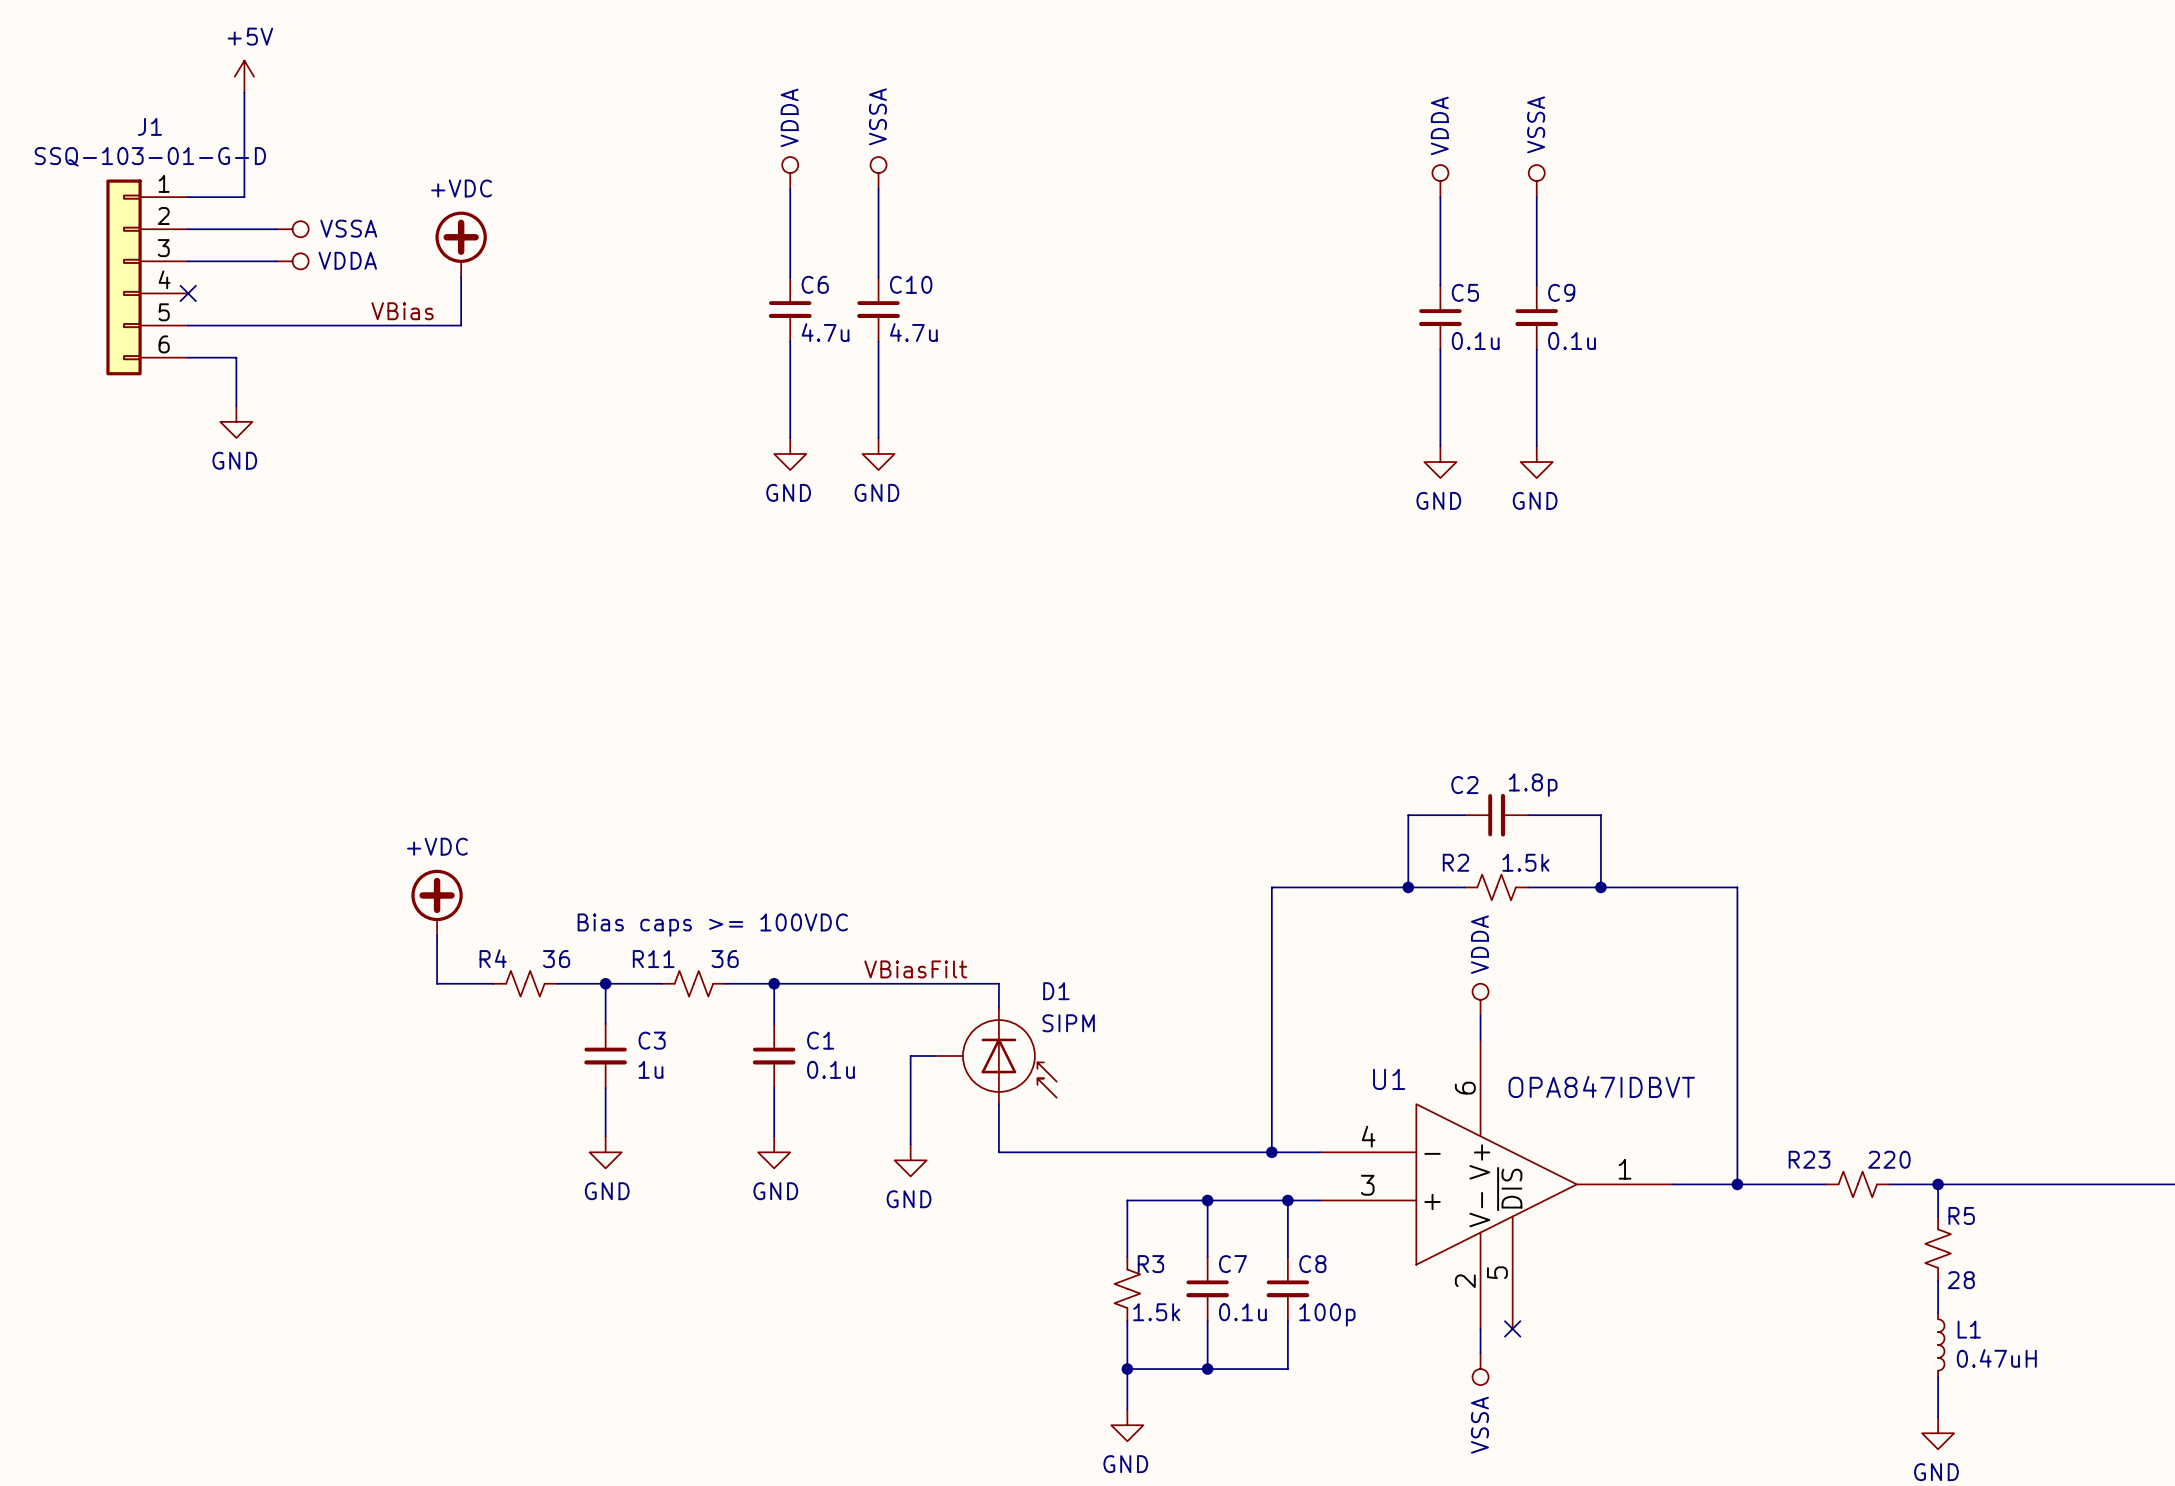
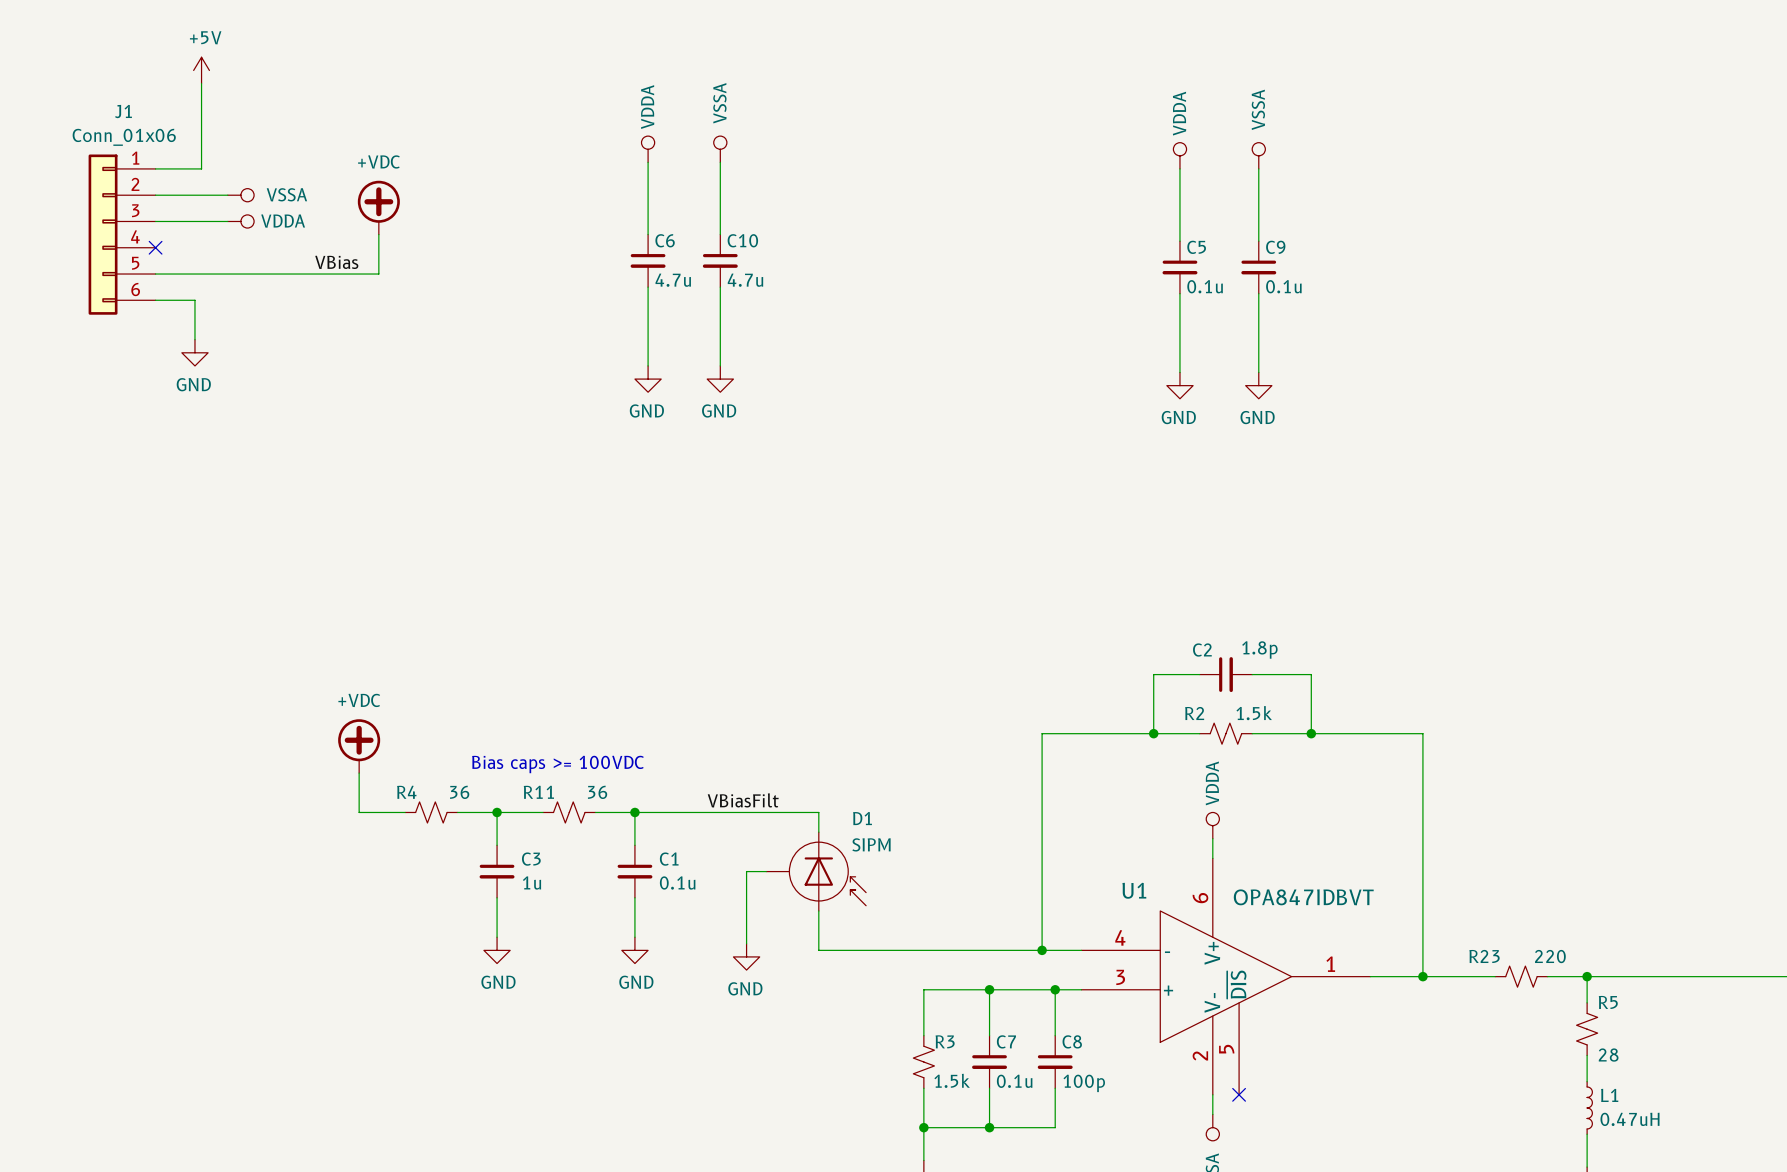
J1 value: SSQ-103-01-G-D (150, 156) -> Conn_01x06 (124, 137)

